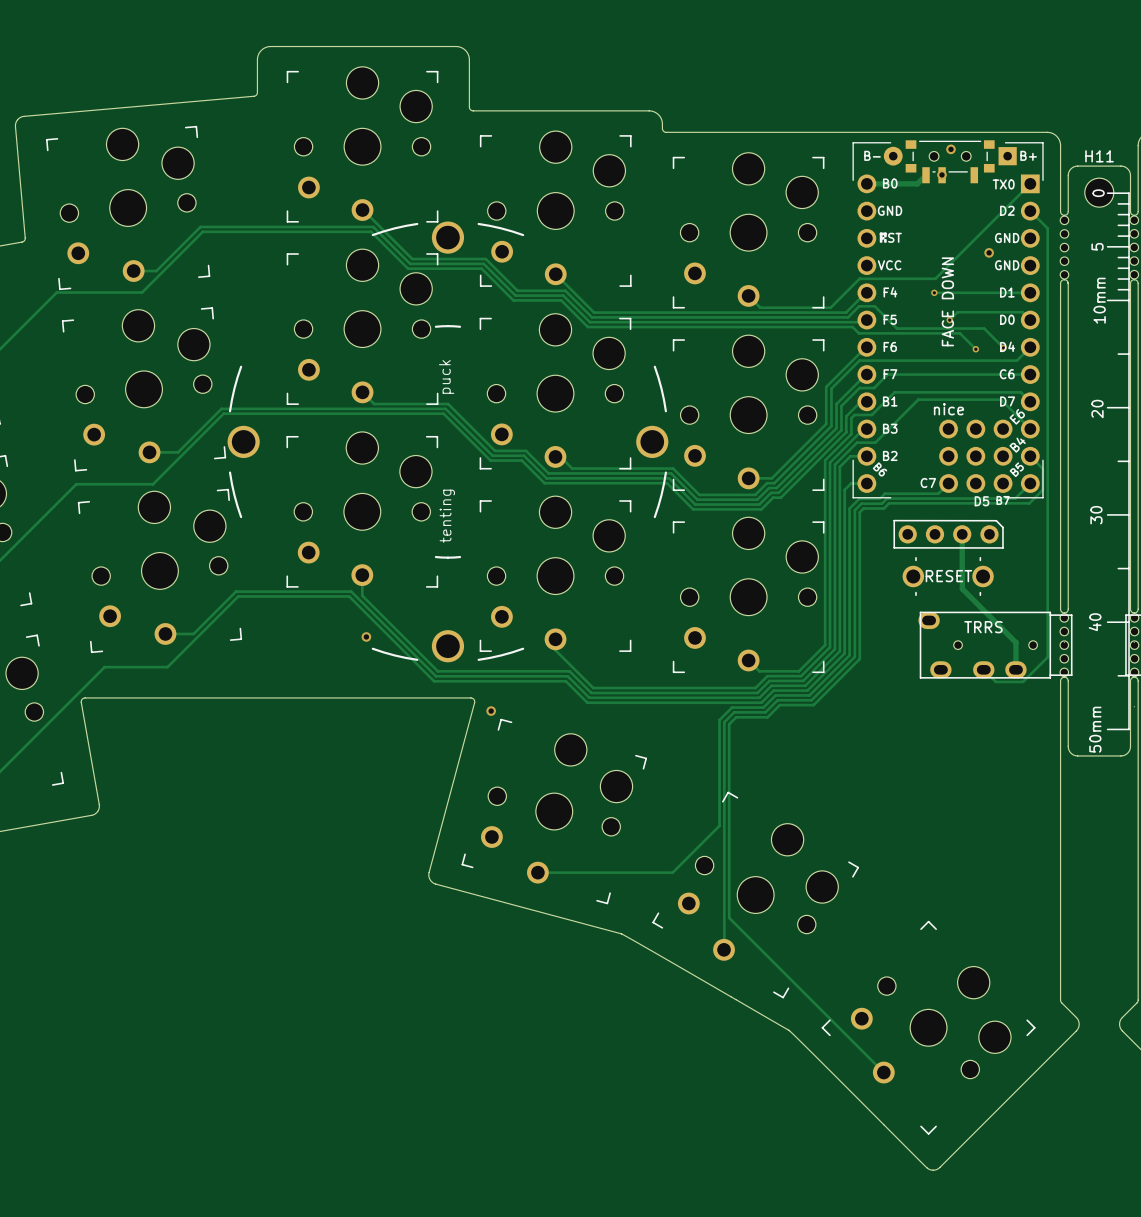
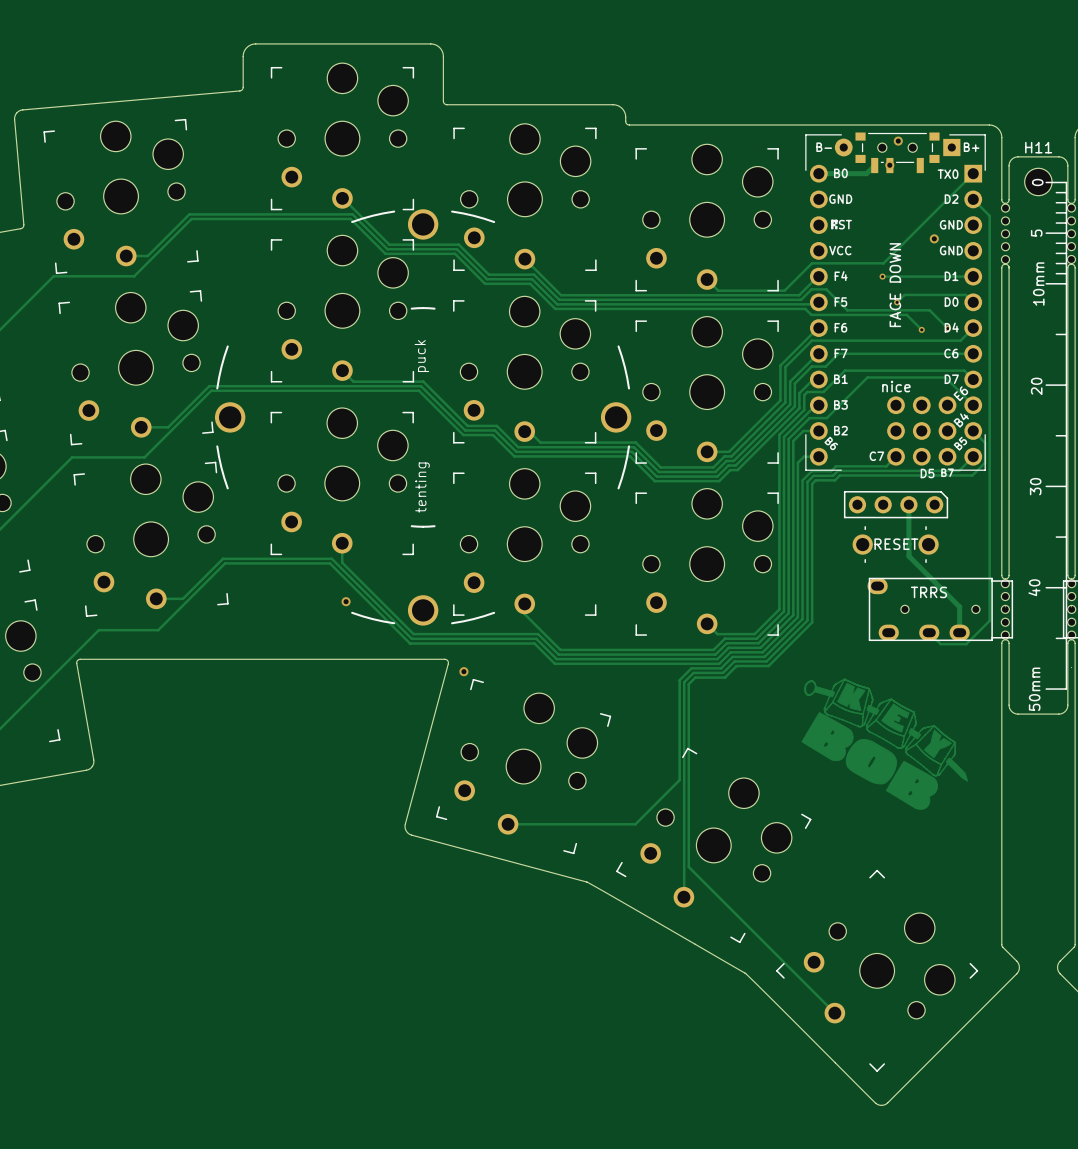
drawing: none -> [801, 680, 969, 810]
track: none -> (848, 681) (844, 679) (834, 685) (824, 707)
track: none -> (848, 681) (844, 679) (832, 702) (848, 710) (863, 714) (869, 688)
track: none -> (869, 688) (872, 700) (864, 723)
track: none -> (895, 701) (891, 699) (880, 703) (867, 724)
track: none -> (895, 701) (891, 699) (876, 720) (888, 730) (904, 736) (914, 712)
track: none -> (832, 702) (824, 711)
track: none -> (824, 710) (827, 714) (858, 726) (863, 725)
track: none -> (914, 712) (915, 724) (904, 745)
track: none -> (863, 714) (862, 725)
track: none -> (876, 720) (867, 728)
track: none -> (934, 725) (916, 744) (927, 756) (941, 764) (955, 742)
track: none -> (934, 725) (922, 729) (906, 747)
track: none -> (866, 726) (869, 731) (897, 747) (902, 747)
track: none -> (904, 736) (901, 747)
track: none -> (955, 742) (954, 754) (940, 773)
track: none -> (916, 744) (906, 750)
track: none -> (906, 749) (907, 754) (933, 774) (938, 775)
track: none -> (941, 764) (936, 775)

